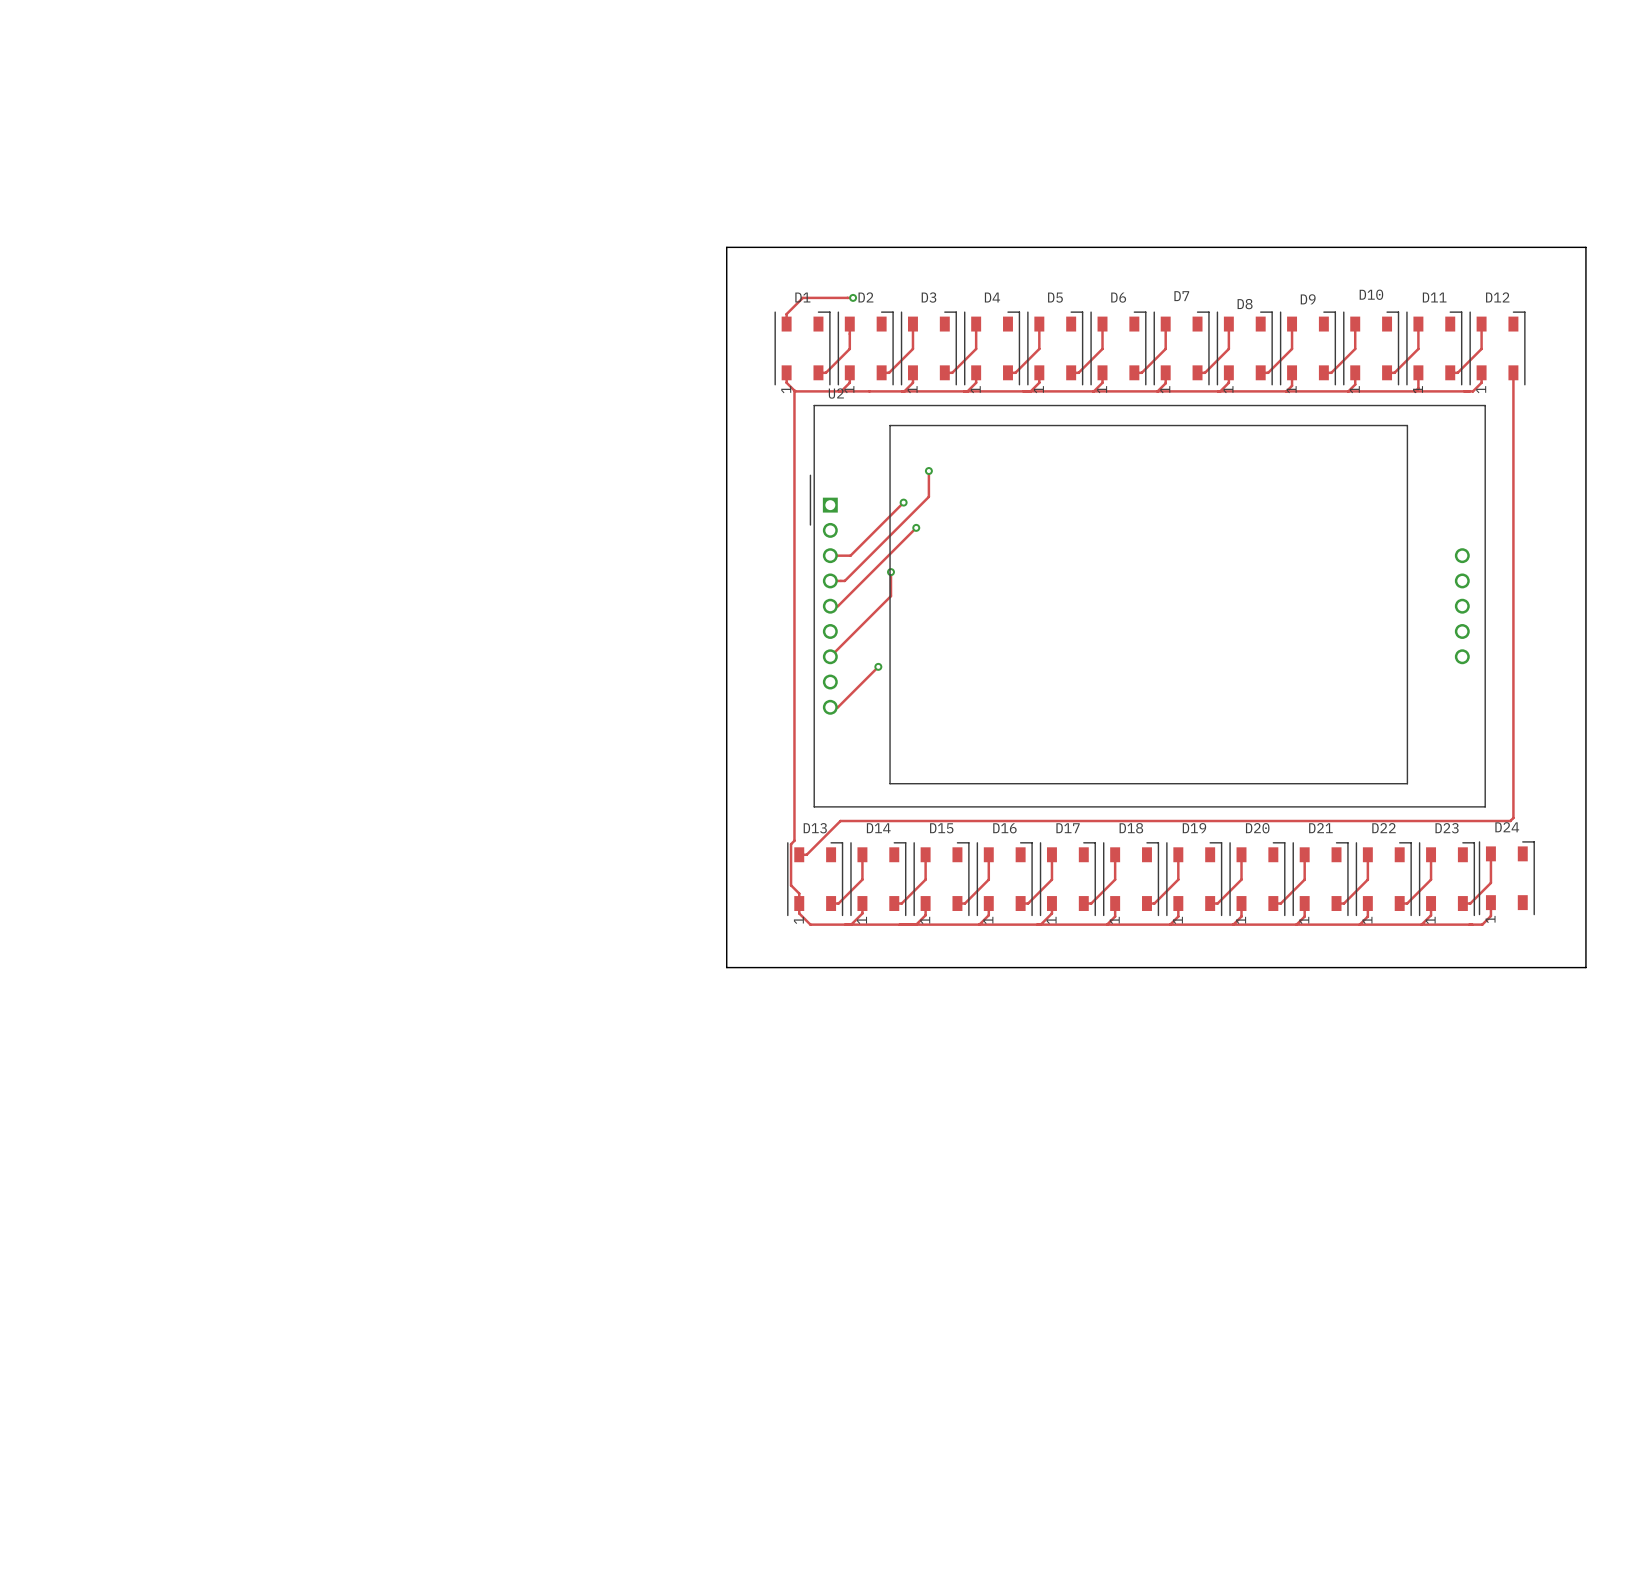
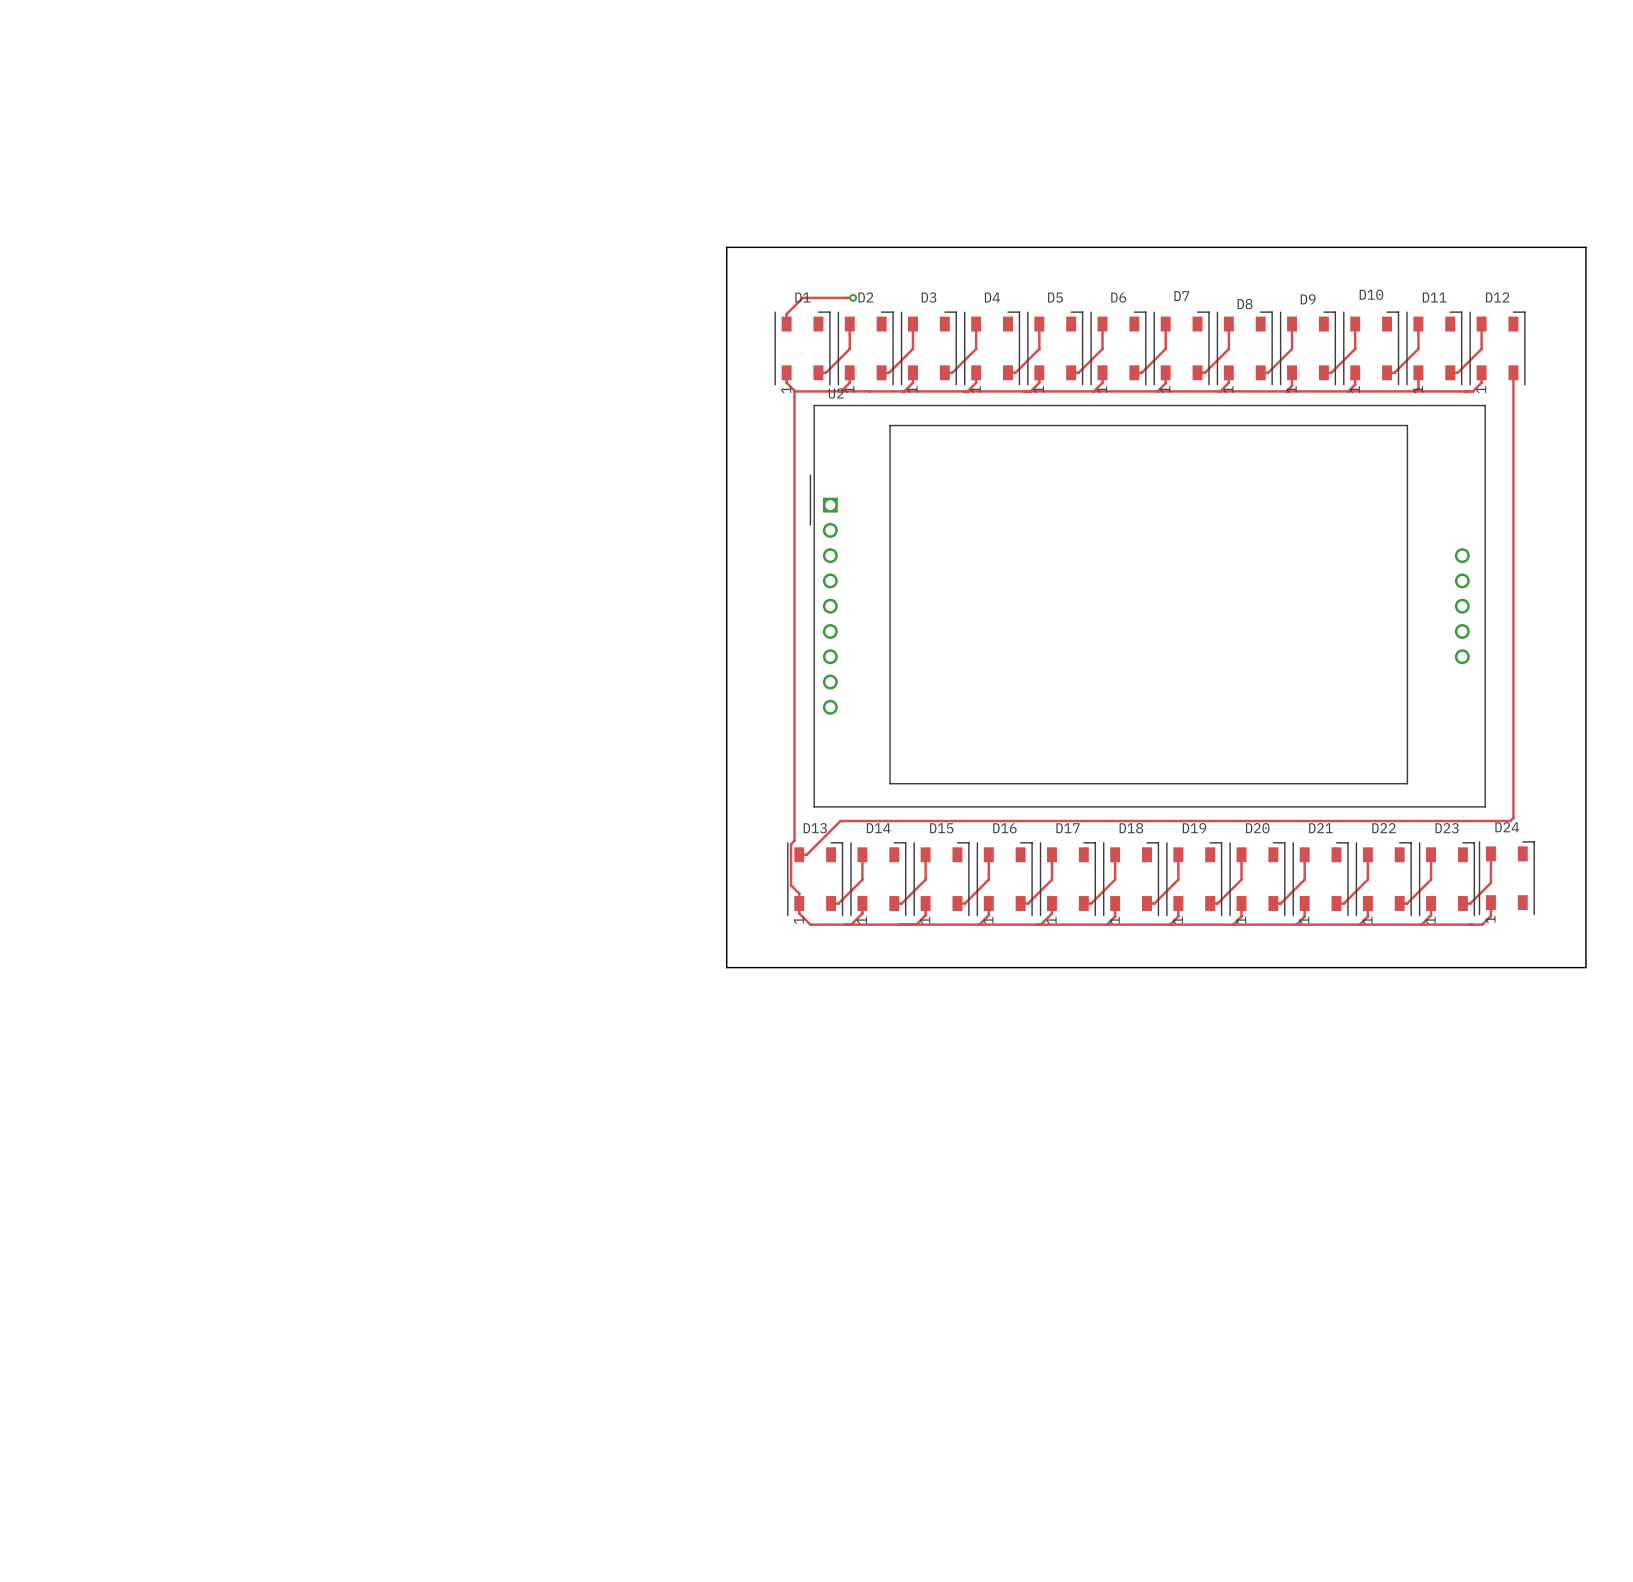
track: (928, 471) (928, 496) (844, 580) (830, 580) -> none
via: (928, 471) -> none
track: (903, 502) (850, 555) (830, 555) -> none
via: (903, 502) -> none
track: (916, 527) (837, 606) (830, 606) -> none
via: (916, 527) -> none
track: (890, 572) (890, 596) (830, 656) -> none
via: (890, 572) -> none
track: (878, 666) (837, 707) (830, 707) -> none
via: (878, 666) -> none

